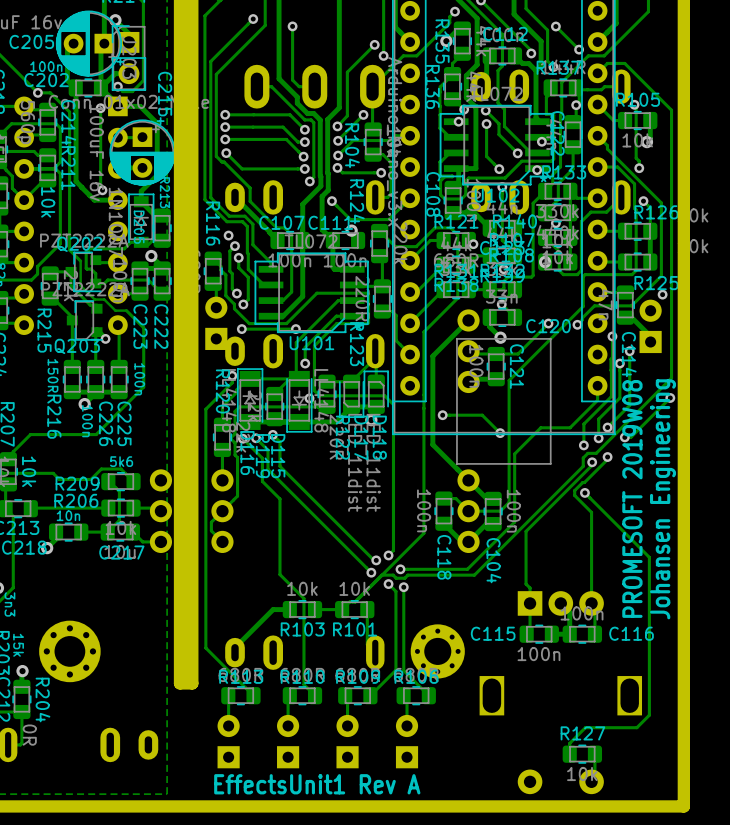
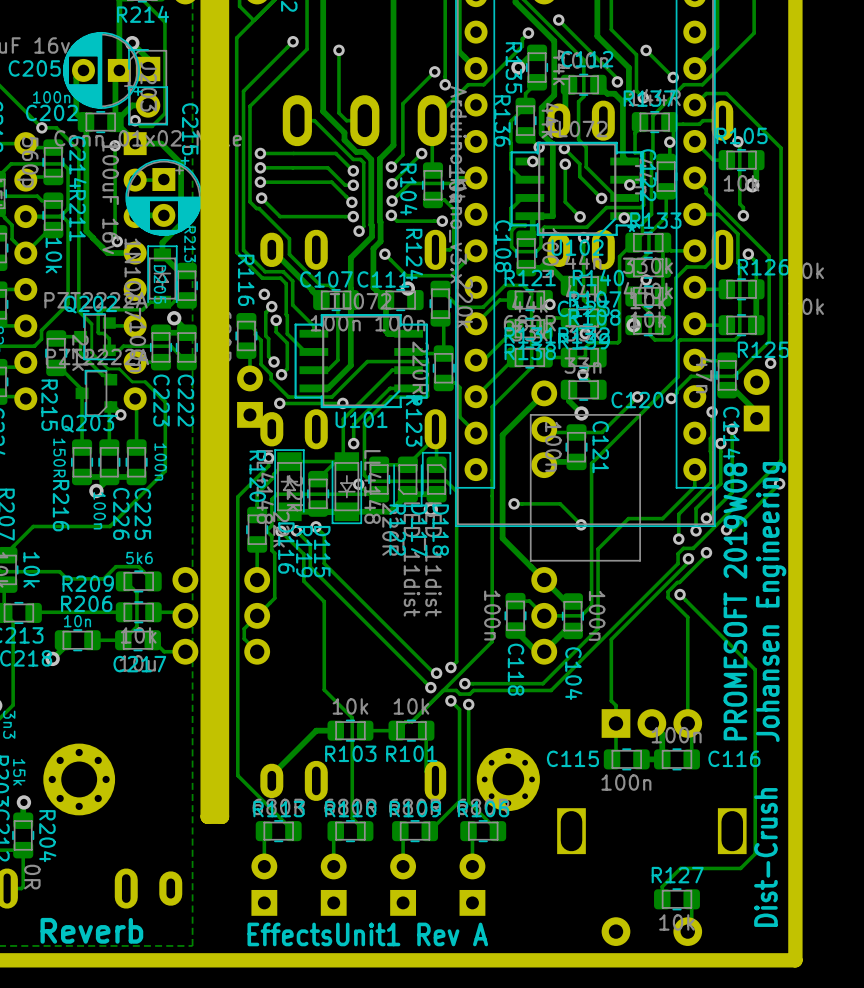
text: none -> Dist-Crush (765, 857)
text: none -> Reverb (91, 930)

